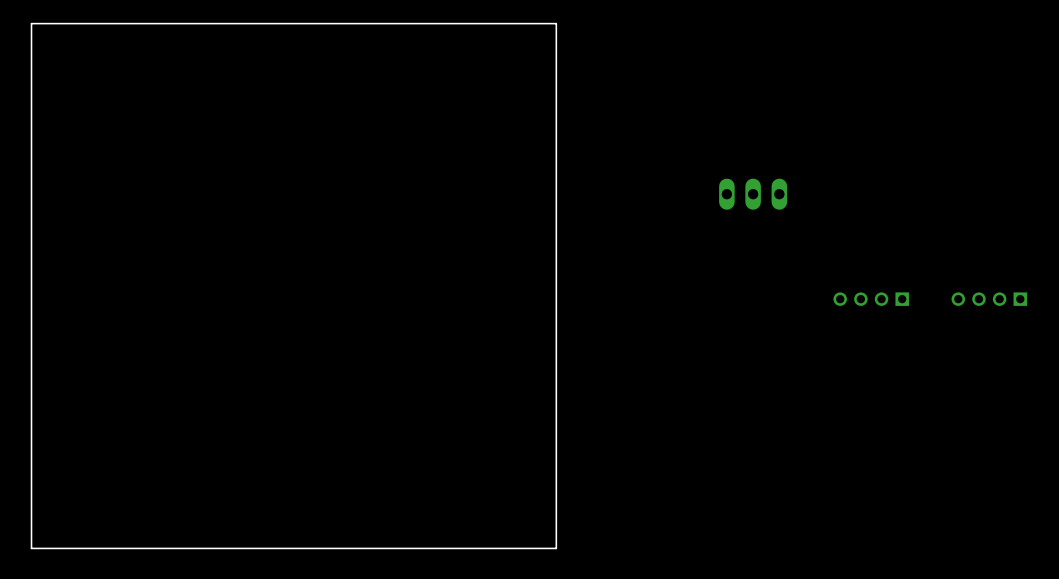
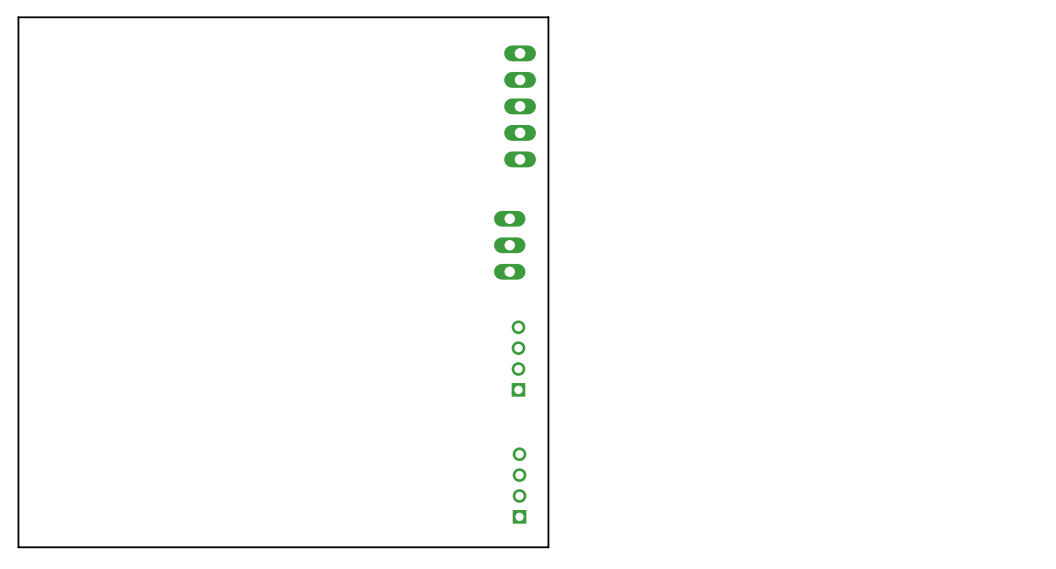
part: none -> (520, 106)
part rotation: 0° (753, 194) -> 90° clockwise (509, 245)
part position: (753, 194) -> (509, 245)
part: (871, 299) -> none
part: (989, 299) -> none
part: none -> (518, 358)
part: none -> (519, 485)

